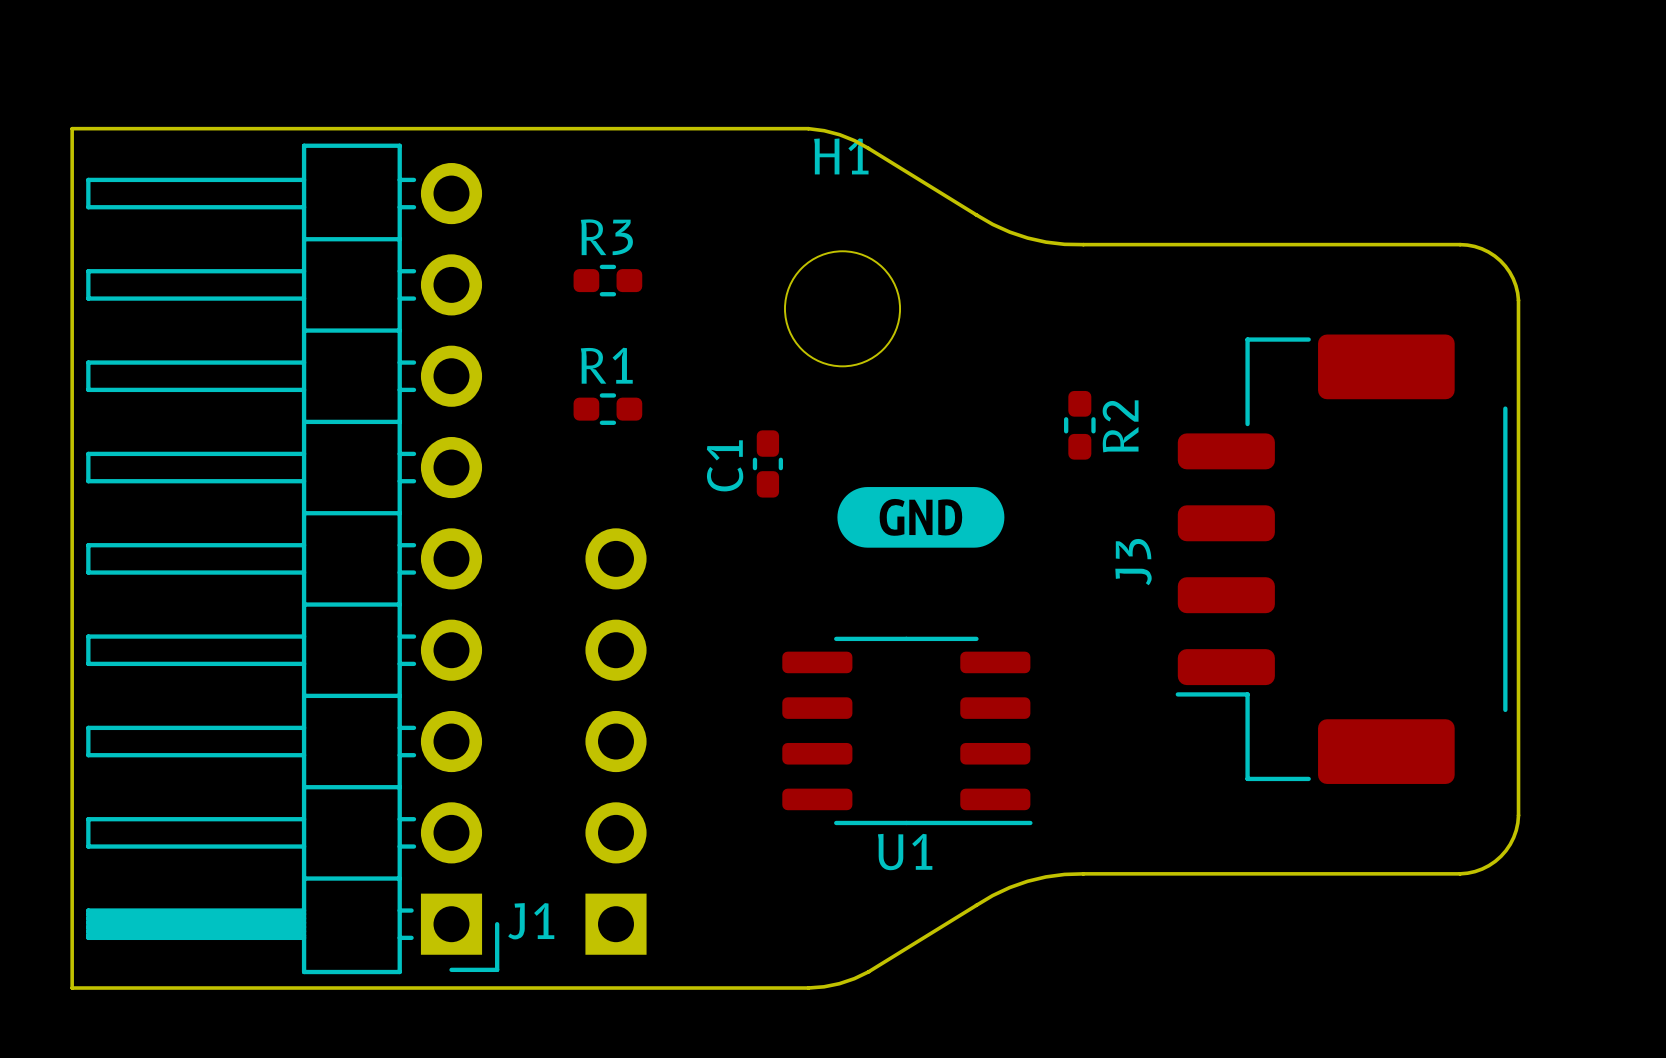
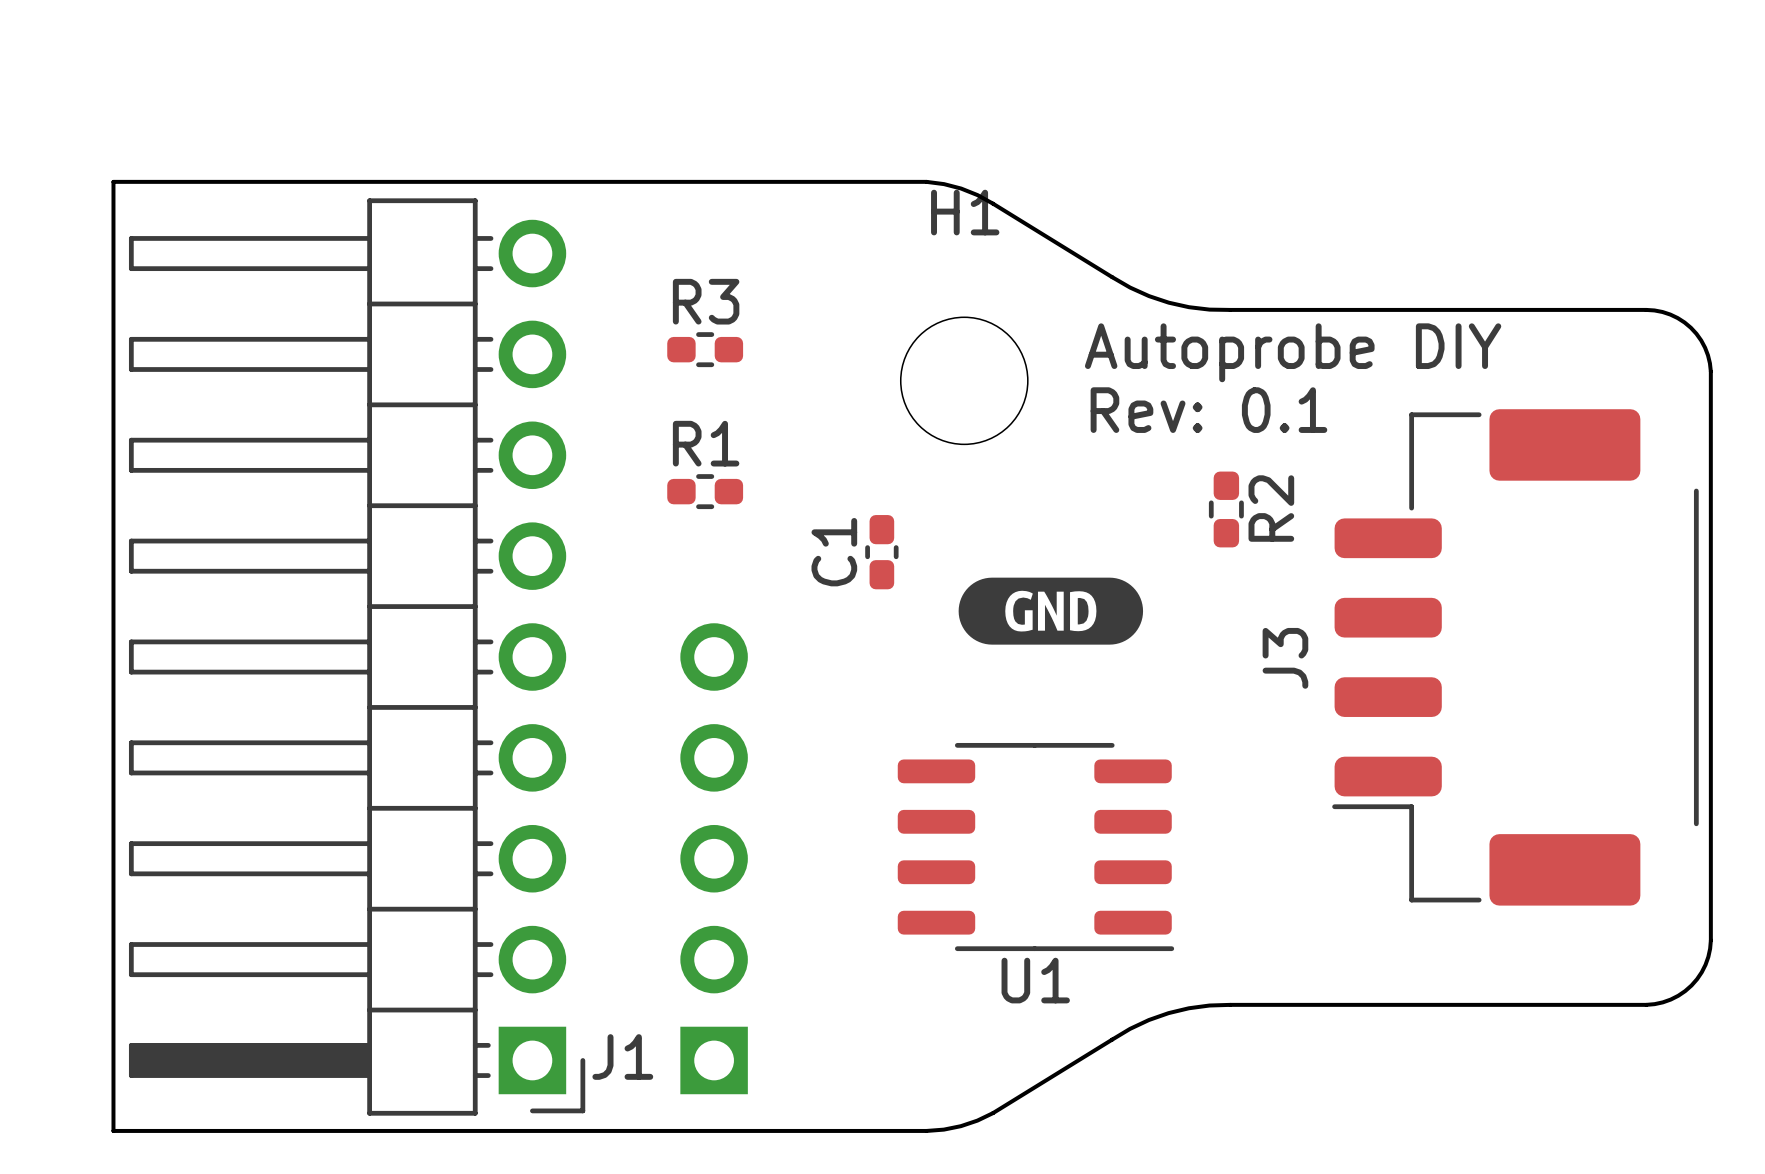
text: none -> Autoprobe DIY (1293, 352)
text: none -> Rev: 0.1 (1208, 410)

